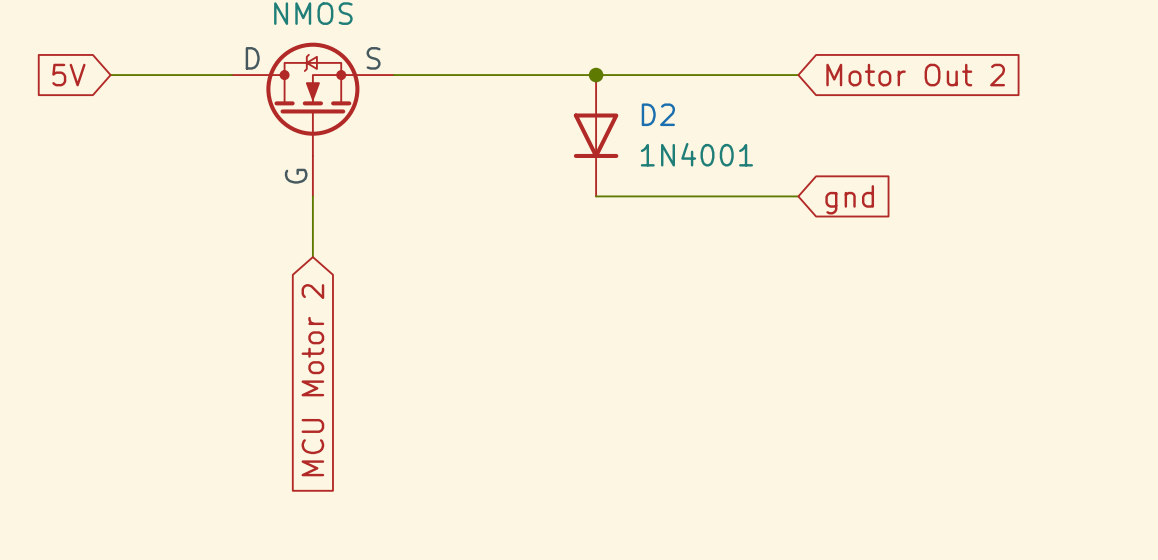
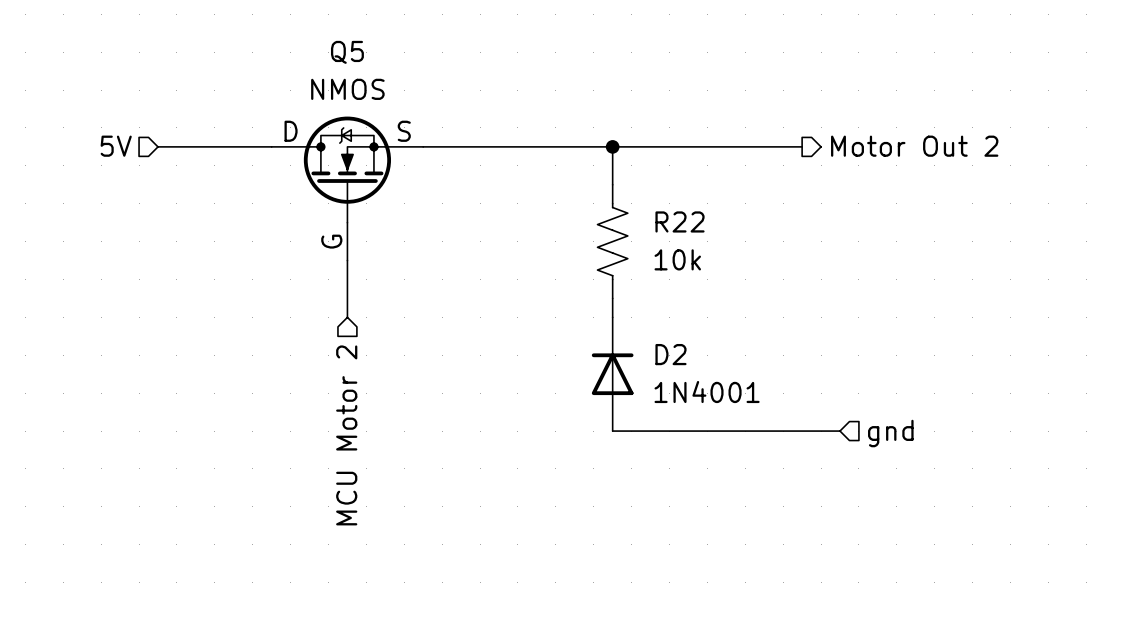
hierarchical label: none -> 5V (116, 146)
hierarchical label: none -> Motor Out 2 (914, 146)
global label: 5V (68, 75) -> none
global label: Motor Out 2 (915, 75) -> none
D2 rotation: 0° (596, 135) -> 180° (612, 374)
D2 position: (596, 135) -> (612, 374)
R22: none -> 10k (612, 241)
wire: (596, 196) (798, 196) -> none
global label: gnd (849, 199) -> none
wire: none -> (612, 298) (612, 317)
wire: none -> (612, 431) (839, 431)
global label: MCU Motor 2 (312, 380) -> none
hierarchical label: none -> gnd (890, 433)
hierarchical label: none -> MCU Motor 2 (346, 435)

